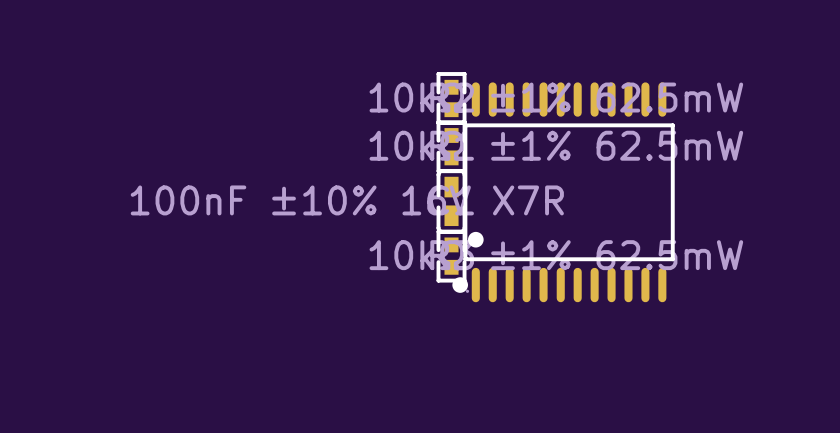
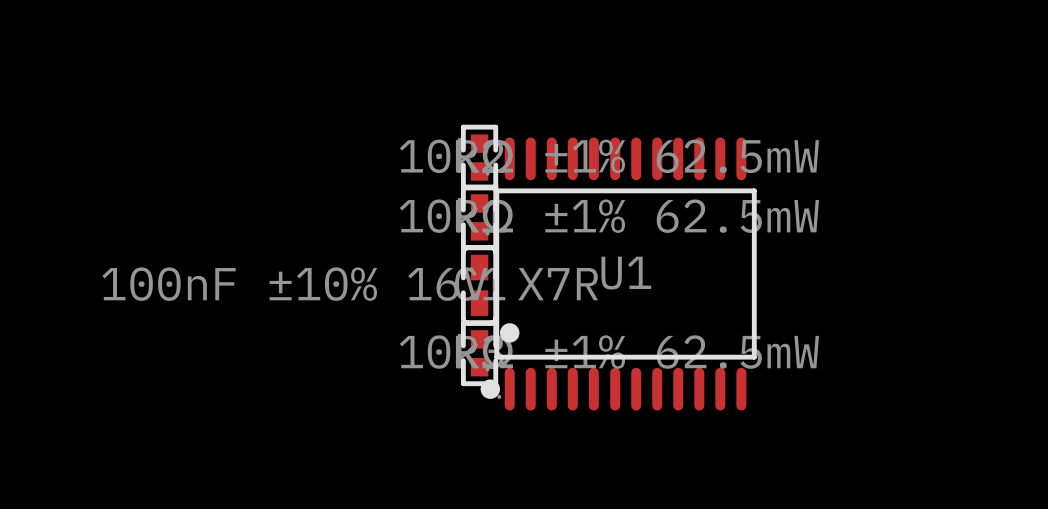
U1 name: none -> U1 (626, 273)

